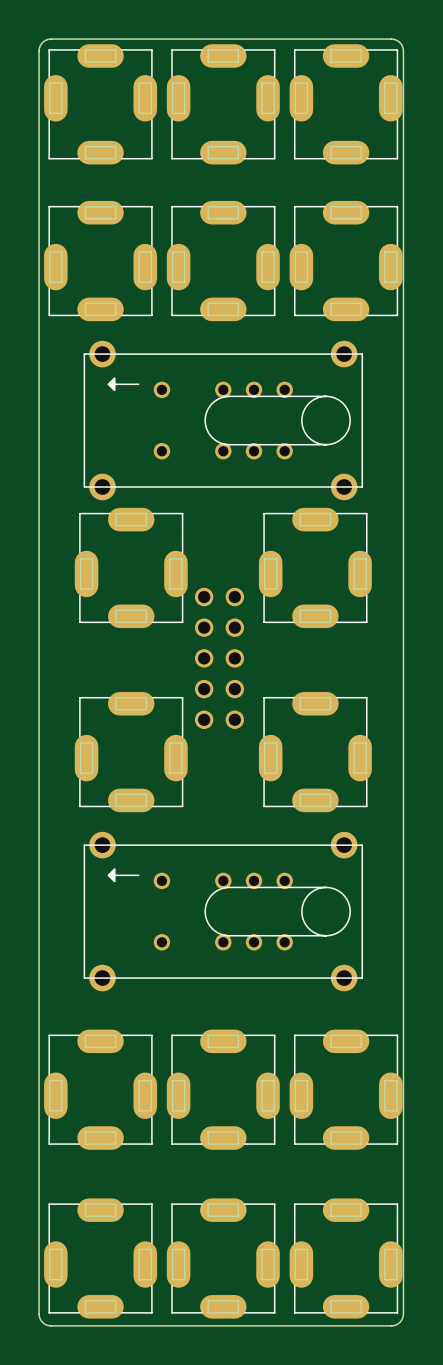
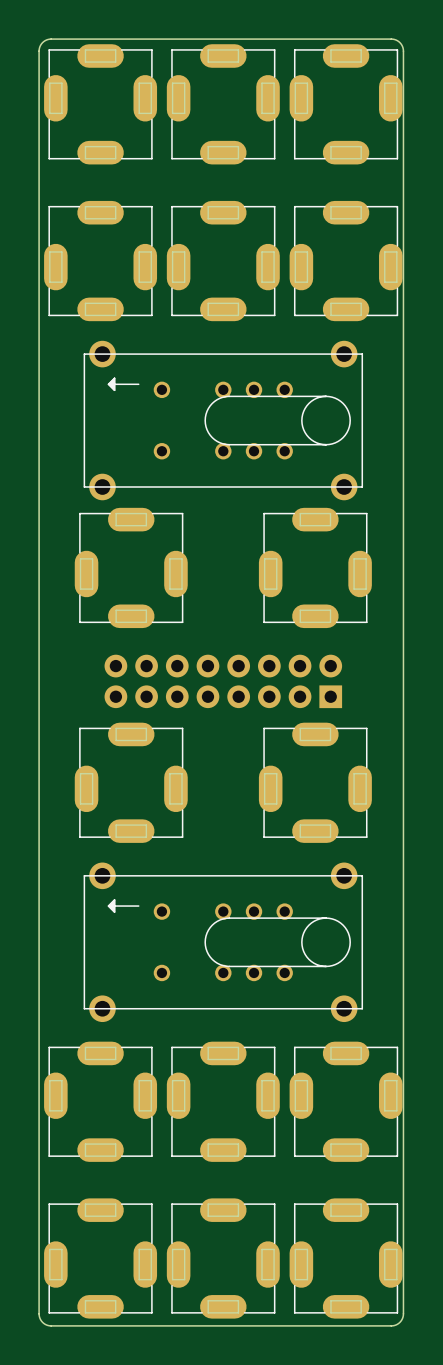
part: (219, 658) -> none
part: none -> (223, 681)
part position: (131, 752) -> (131, 782)
part position: (315, 752) -> (315, 782)
part position: (223, 911) -> (223, 942)
part rotation: 0° (100, 1089) -> 180° (100, 1101)
part rotation: 0° (223, 1089) -> 180° (223, 1101)
part rotation: 0° (346, 1089) -> 180° (346, 1101)

